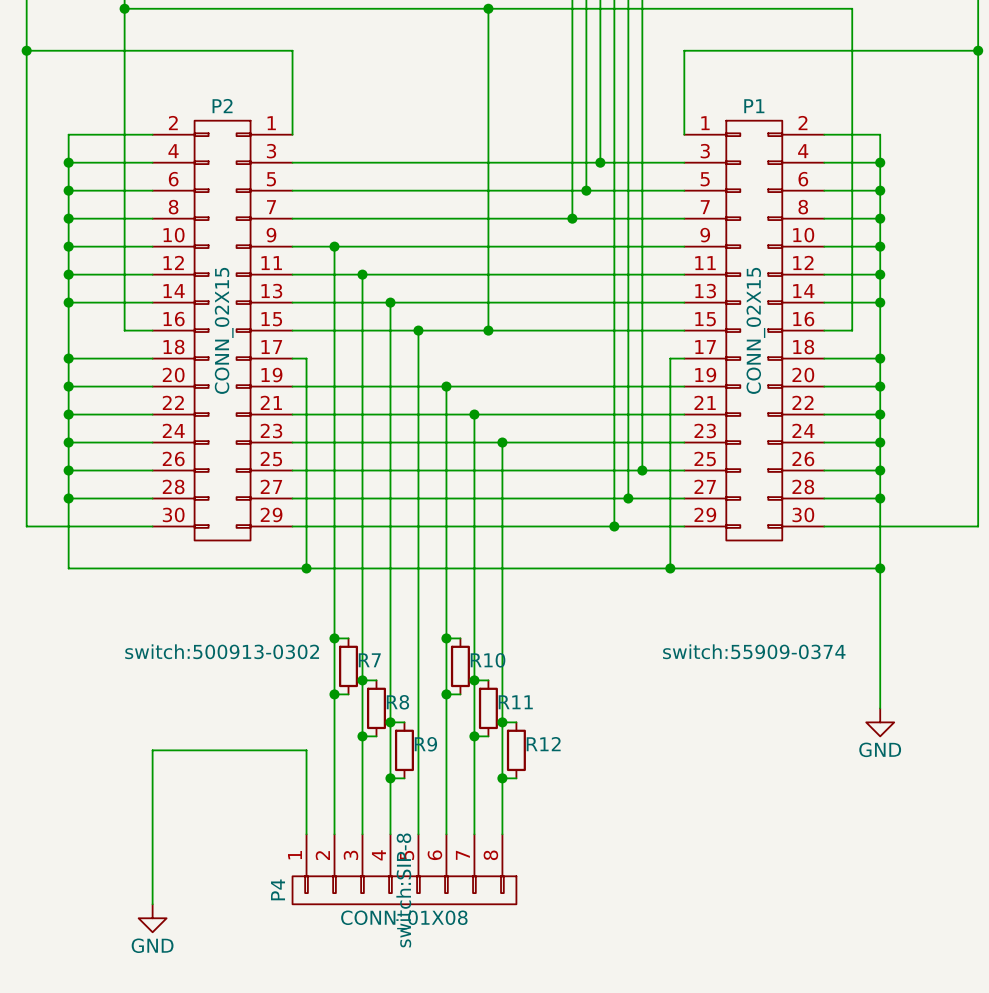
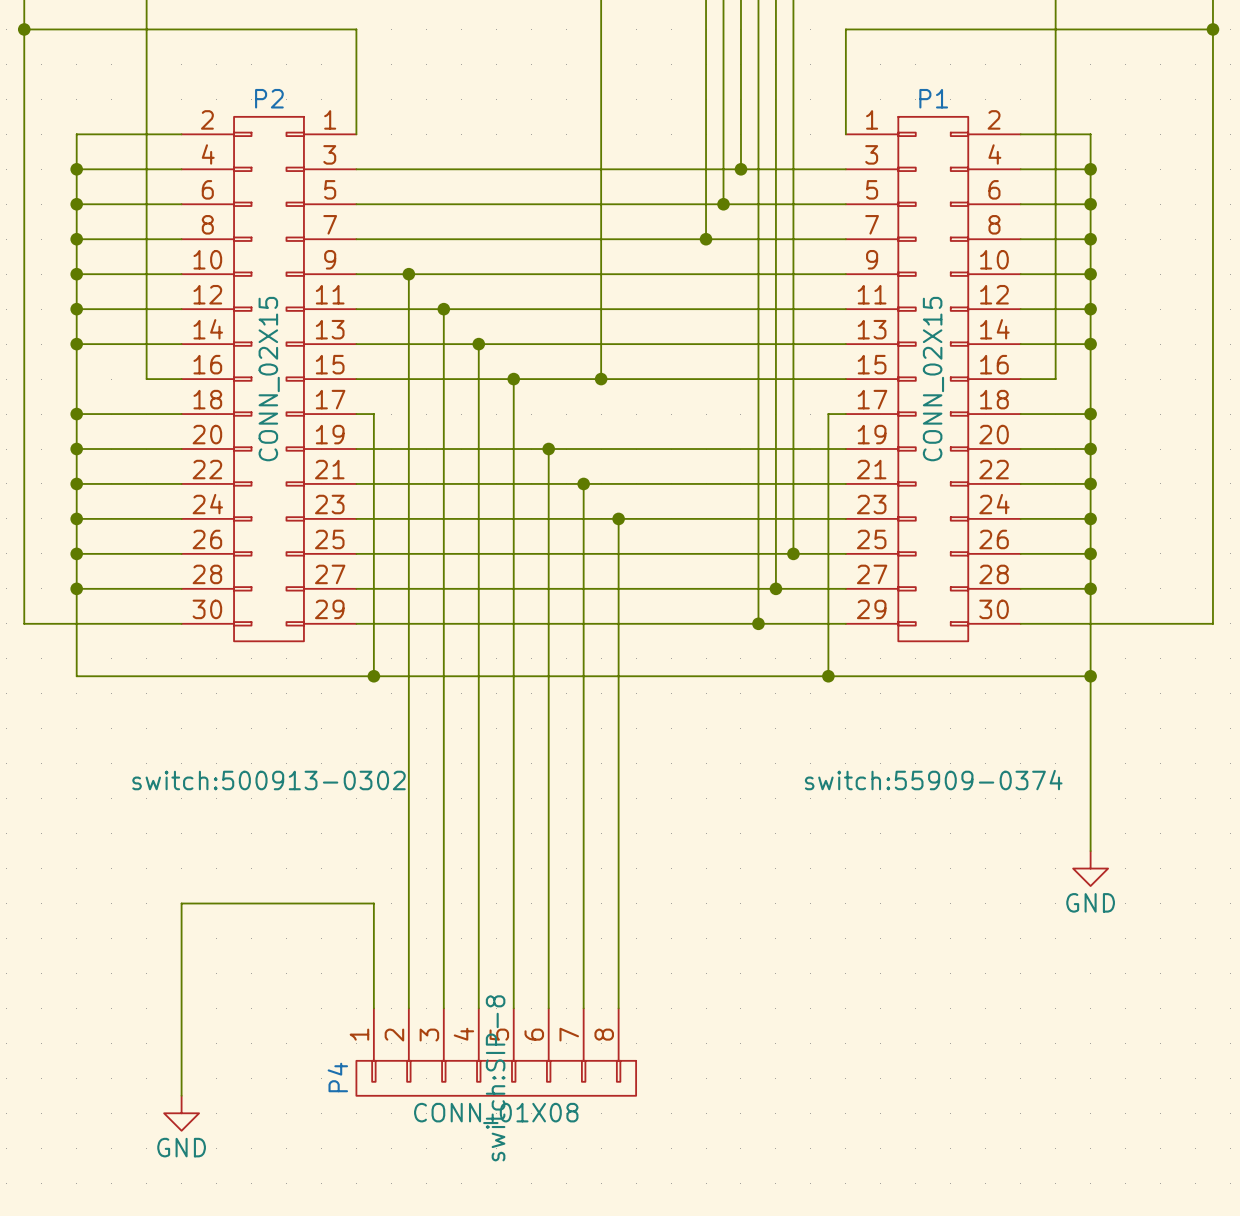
wire: (334, 638) (348, 638) -> none
junction: (334, 638) -> none
wire: (446, 638) (460, 638) -> none
junction: (446, 638) -> none
R7: (348, 666) -> none
R10: (460, 666) -> none
wire: (362, 680) (376, 680) -> none
junction: (362, 680) -> none
wire: (474, 680) (488, 680) -> none
junction: (474, 680) -> none
wire: (334, 694) (348, 694) -> none
junction: (334, 694) -> none
wire: (446, 694) (460, 694) -> none
junction: (446, 694) -> none
R8: (376, 708) -> none
R11: (488, 708) -> none
wire: (390, 722) (404, 722) -> none
junction: (390, 722) -> none
wire: (502, 722) (516, 722) -> none
junction: (502, 722) -> none
wire: (362, 736) (376, 736) -> none
junction: (362, 736) -> none
wire: (474, 736) (488, 736) -> none
junction: (474, 736) -> none
R9: (404, 750) -> none
R12: (516, 750) -> none
wire: (390, 778) (404, 778) -> none
junction: (390, 778) -> none
wire: (502, 778) (516, 778) -> none
junction: (502, 778) -> none

